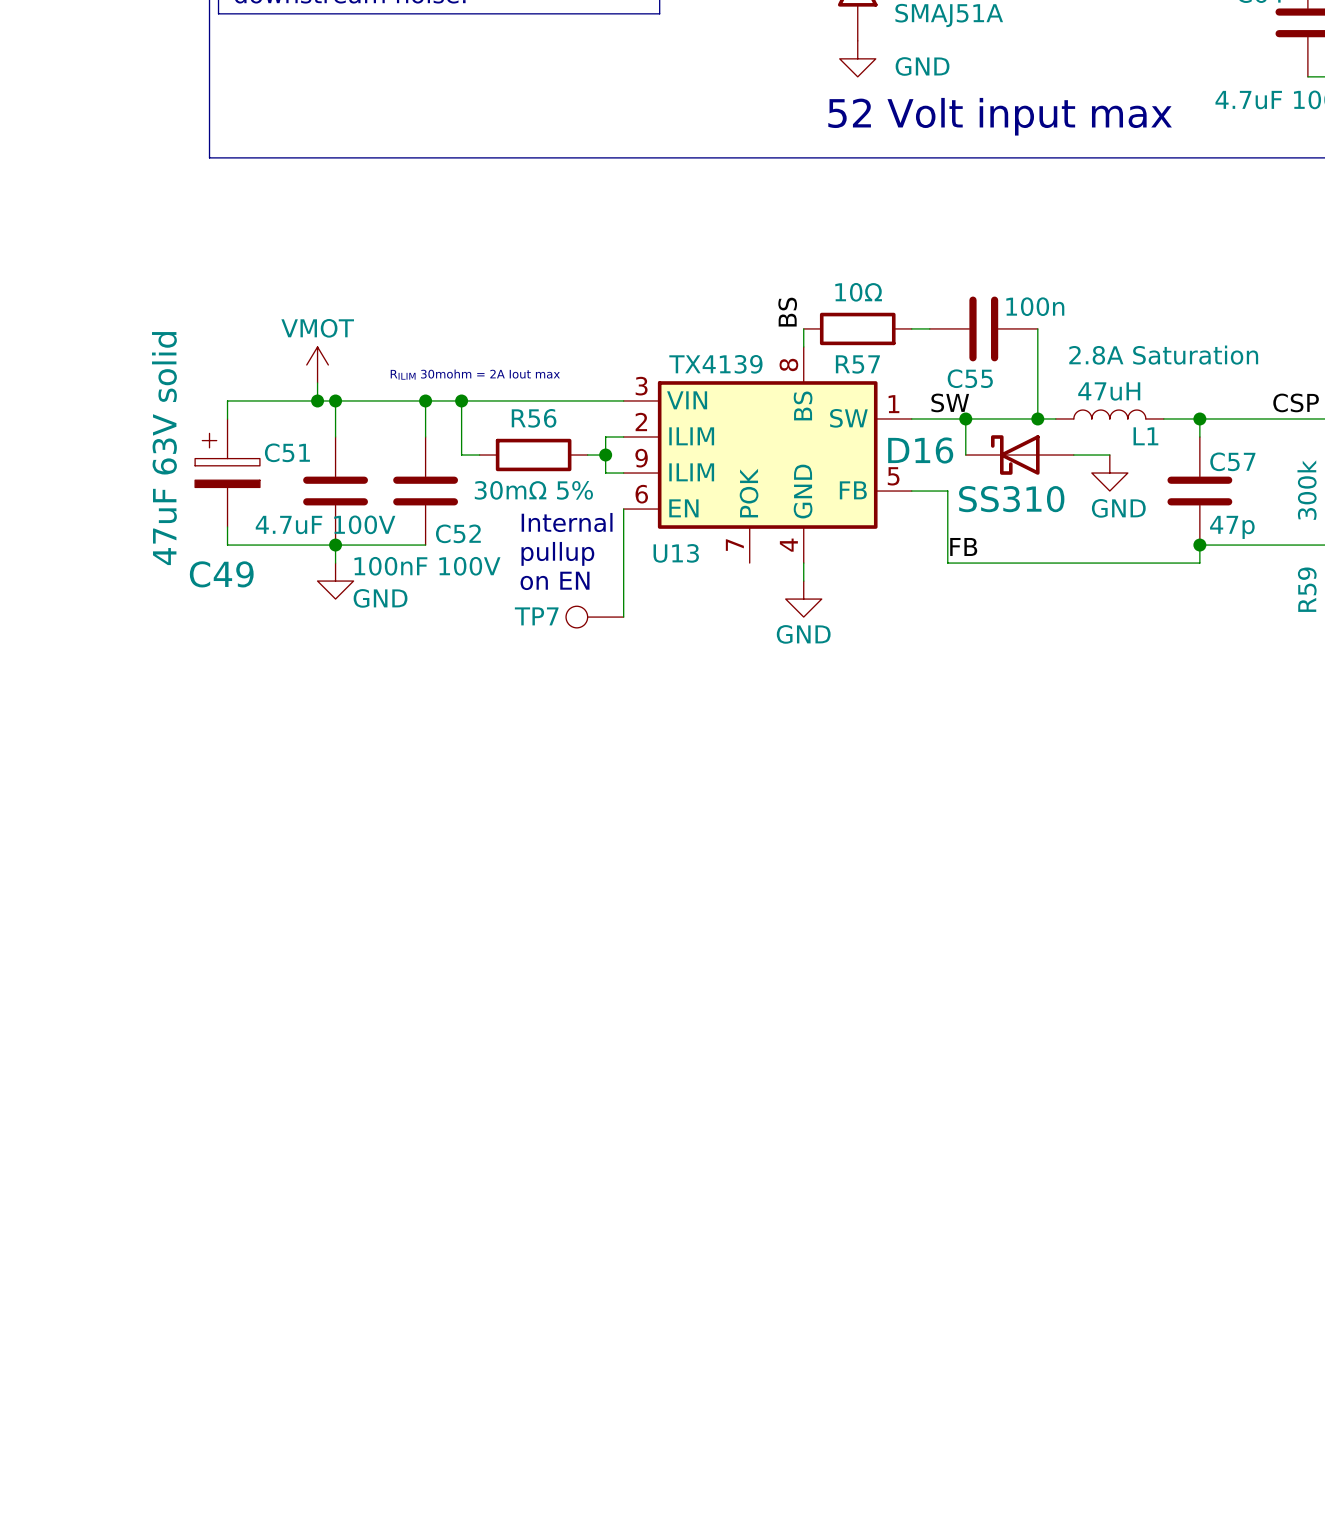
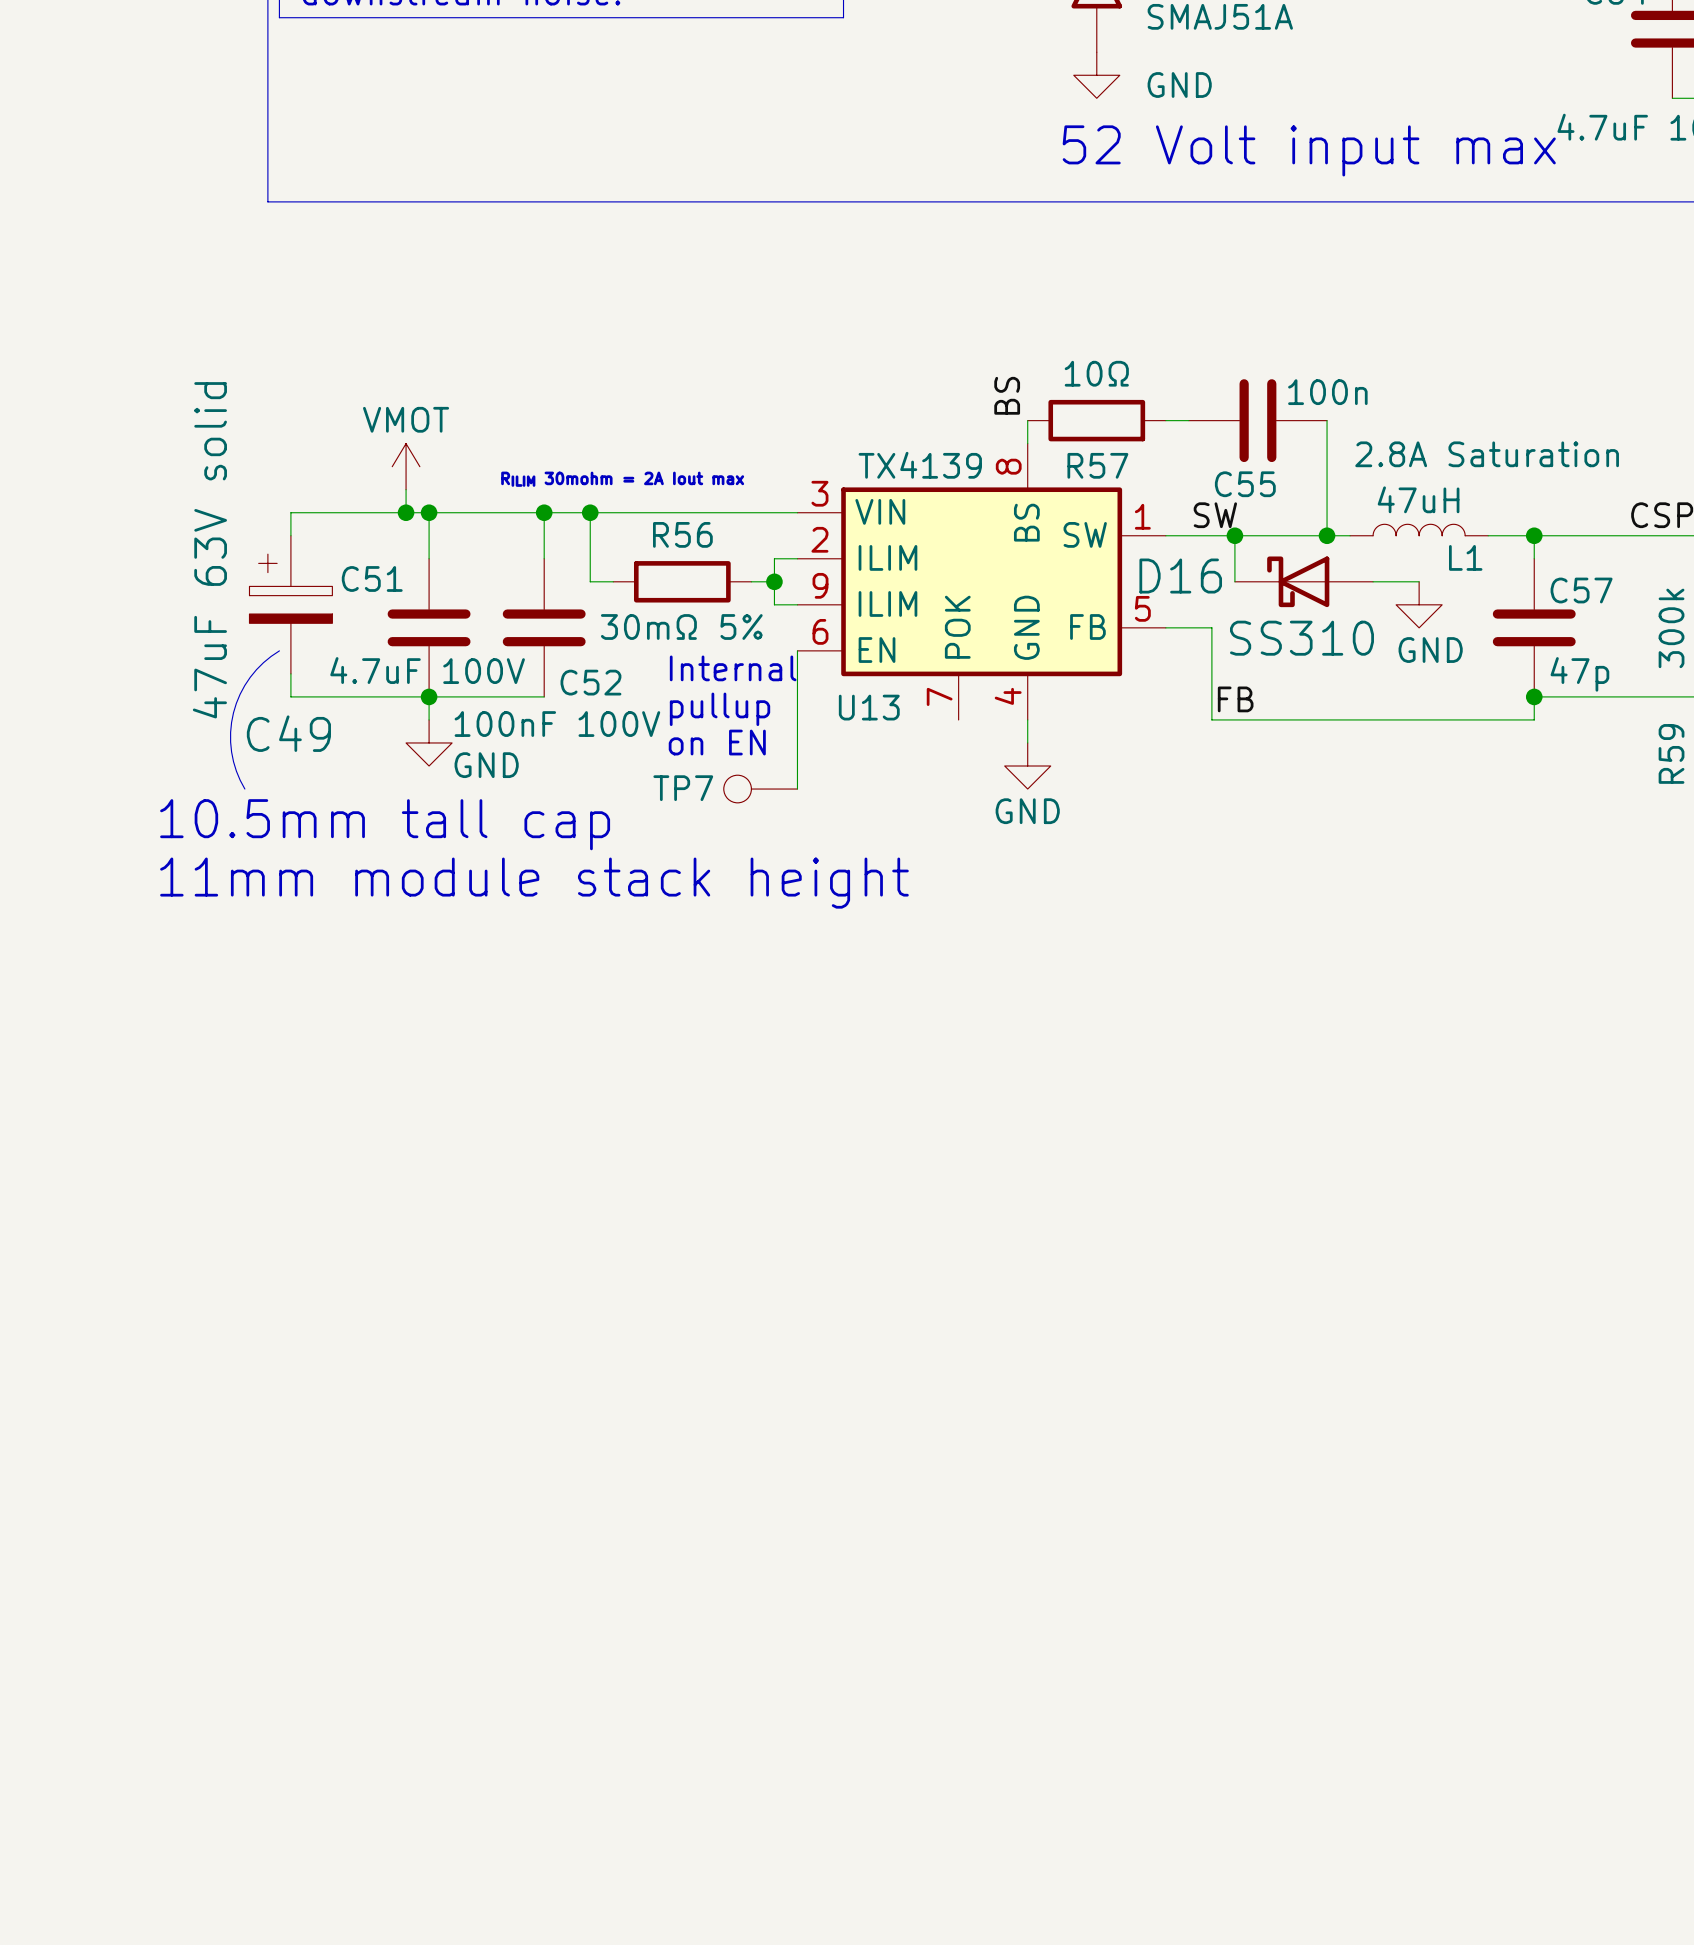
line: none -> (279, 650) (263, 662) (250, 677) (240, 694) (233, 712) (230, 732) (231, 752) (236, 771) (244, 789)
text: none -> 10.5mm tall cap (385, 824)
text: none -> 11mm module stack height (534, 883)

